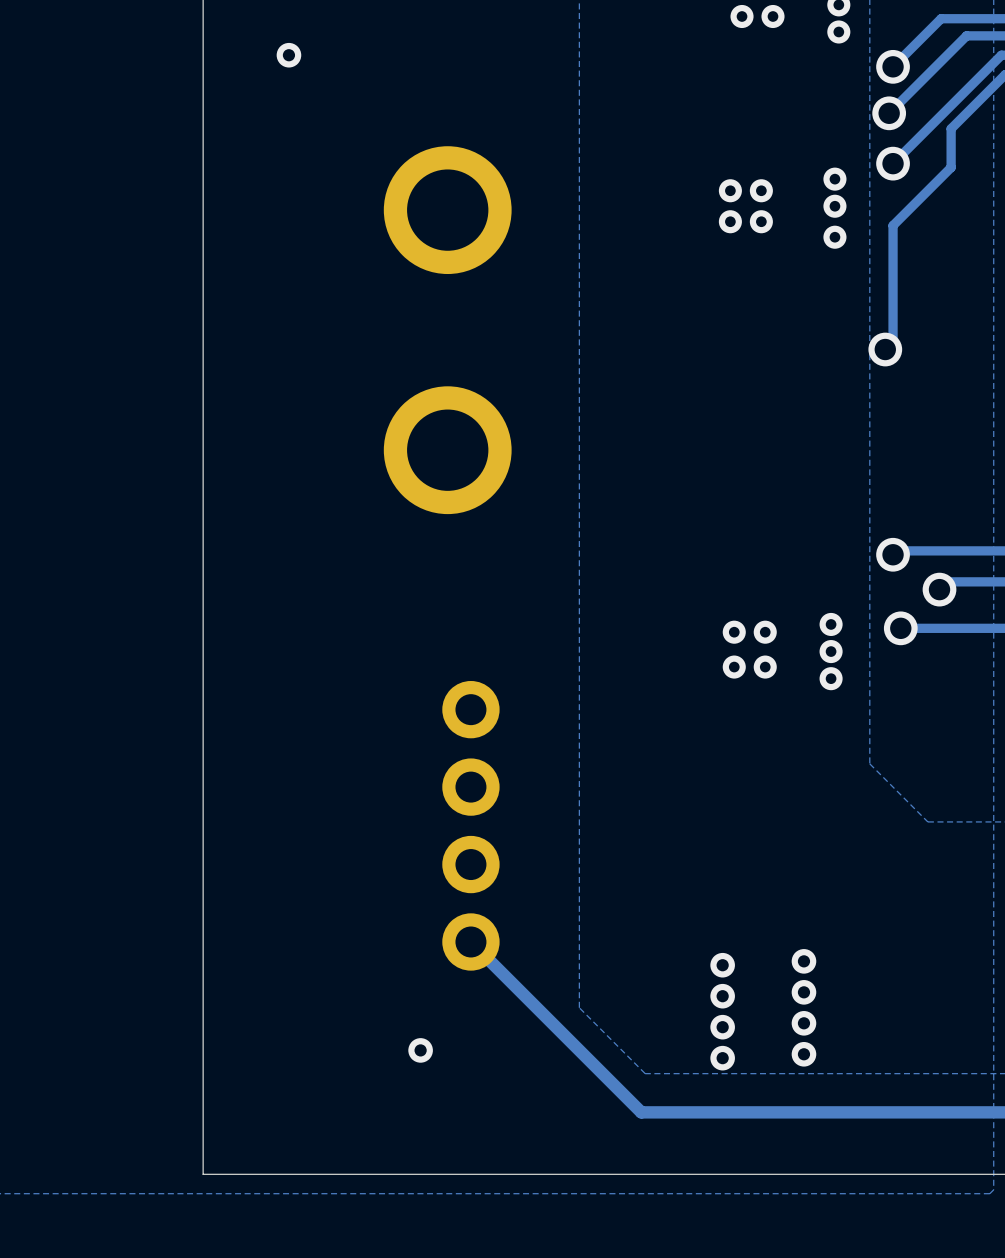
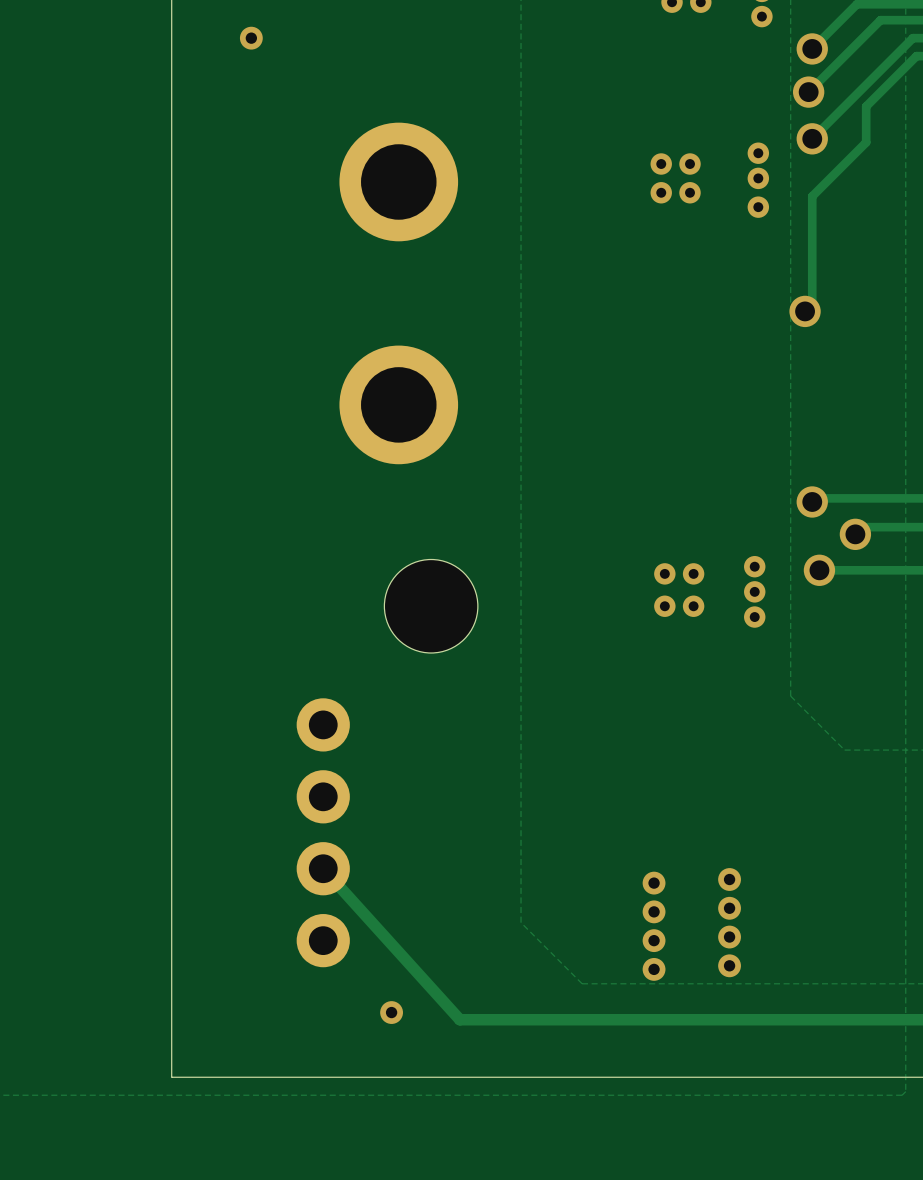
part: none -> (431, 606)
part position: (470, 825) -> (323, 832)
track: (470, 941) (641, 1112) -> (323, 868) (459, 1019) (578, 1019)
via position: (420, 1050) -> (391, 1012)

